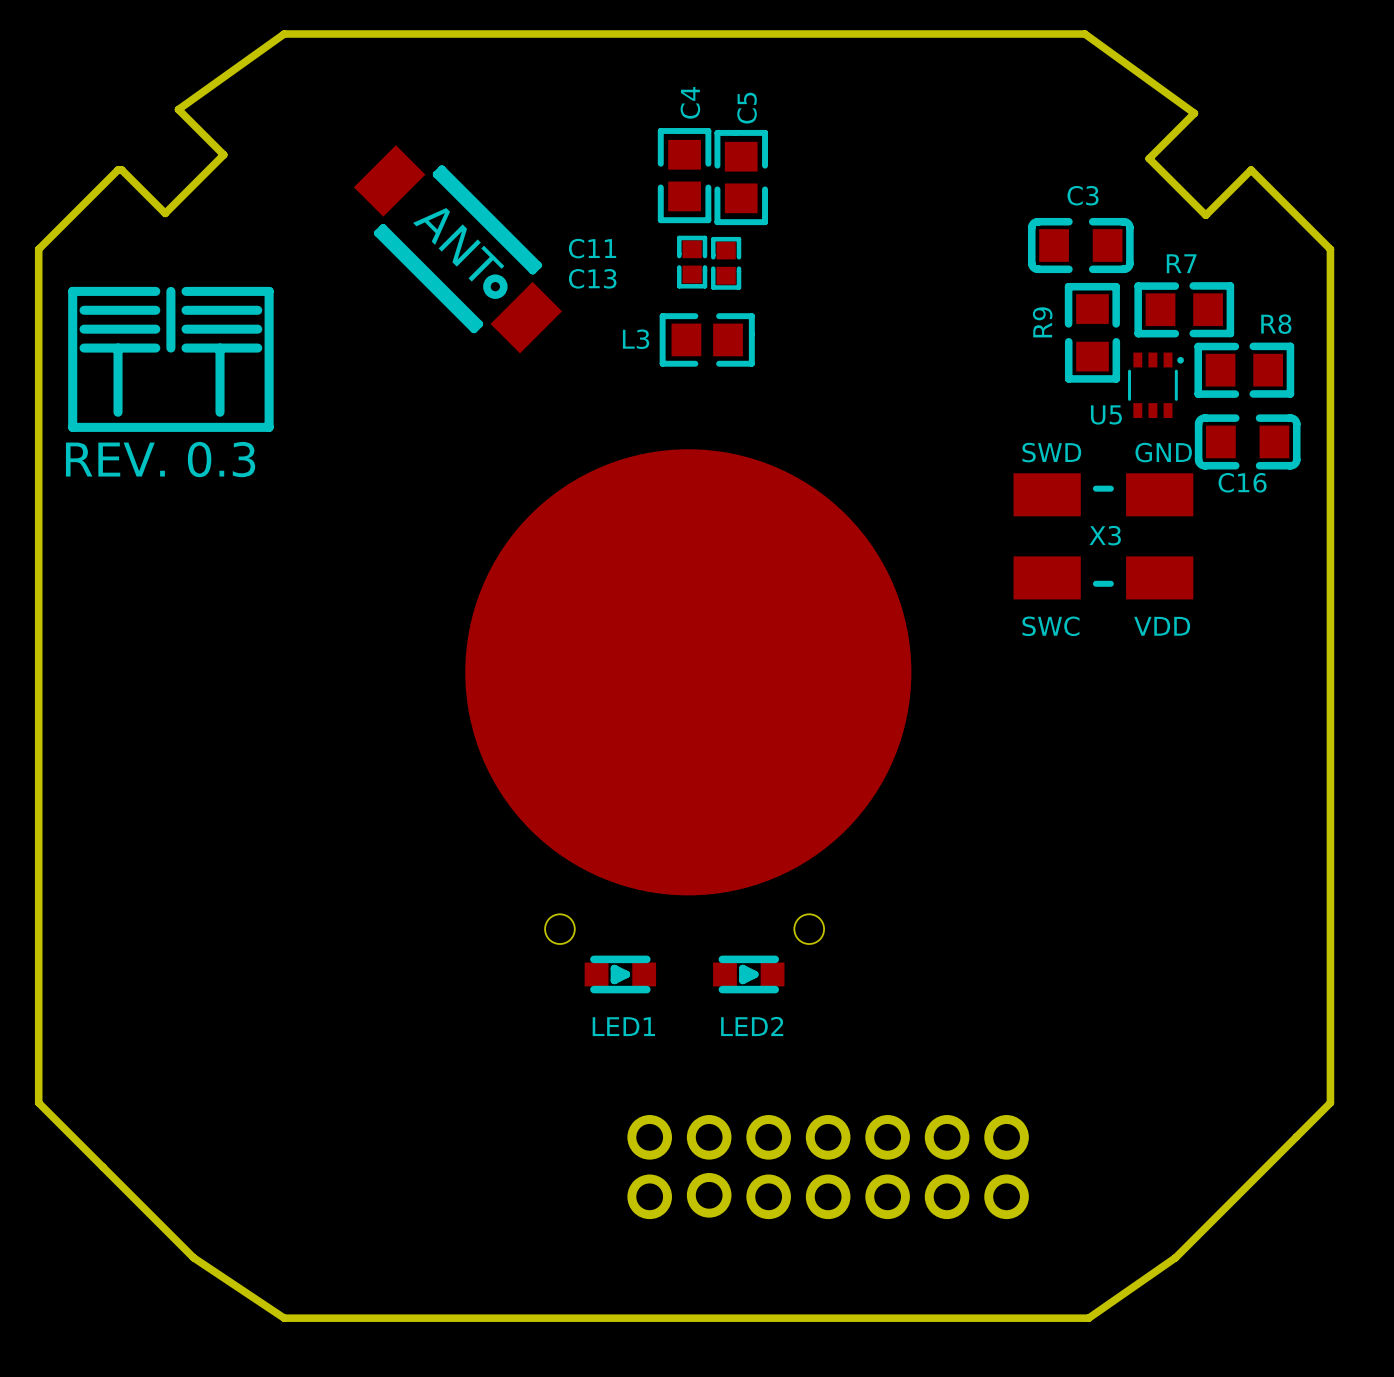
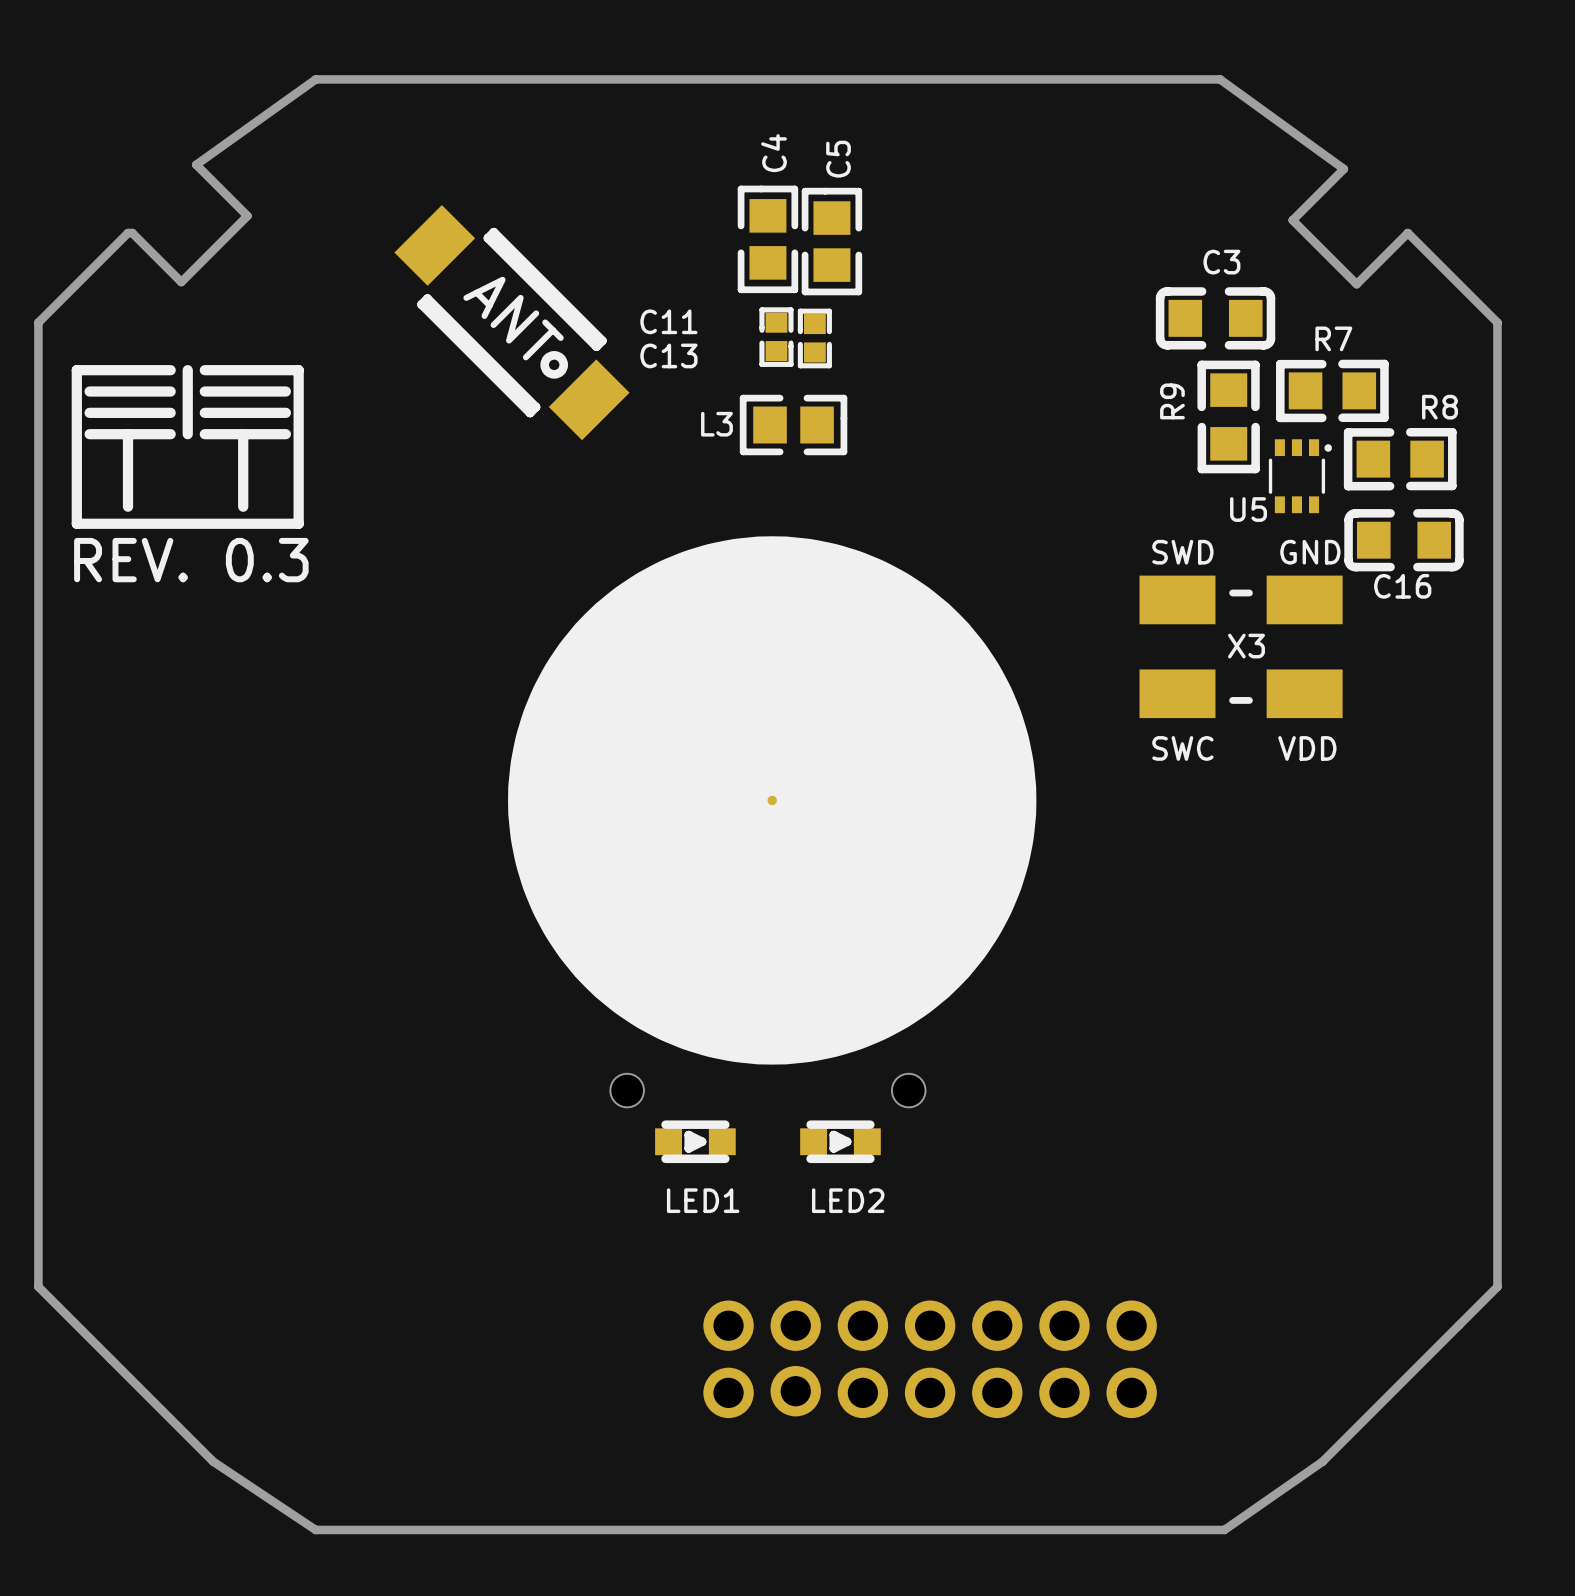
drawing: none -> [508, 536, 1037, 1065]

